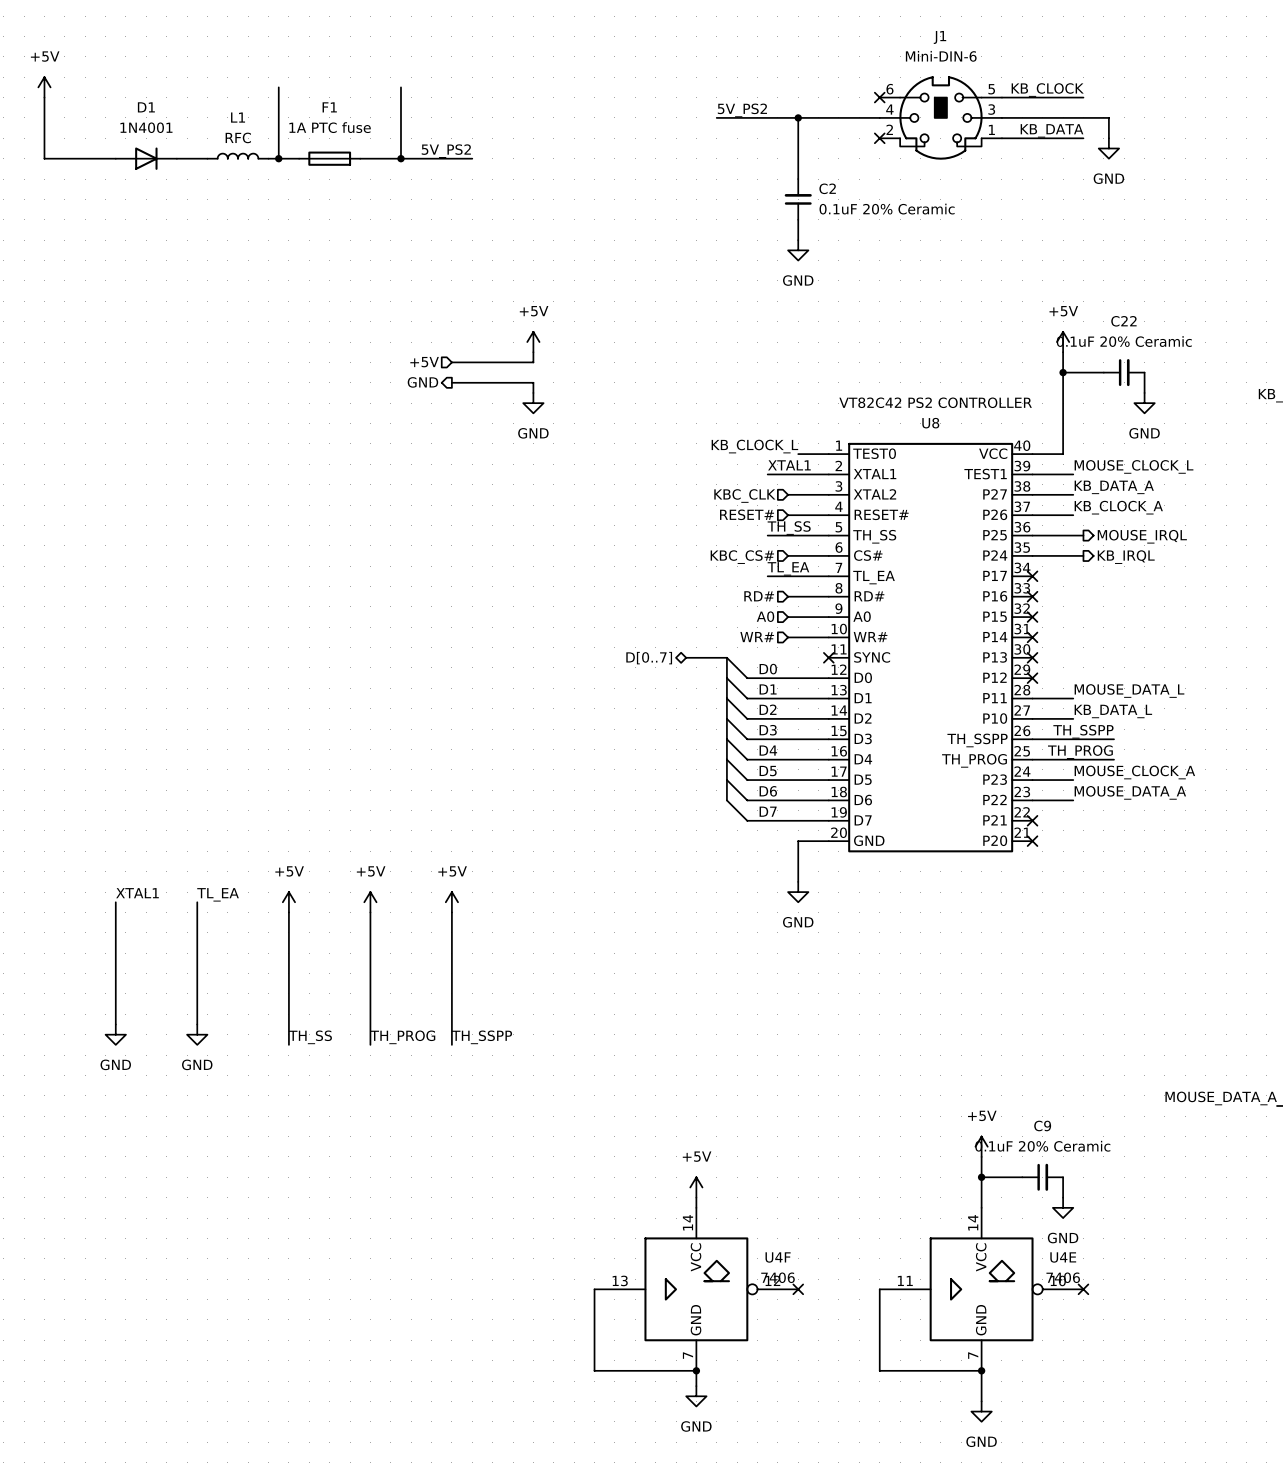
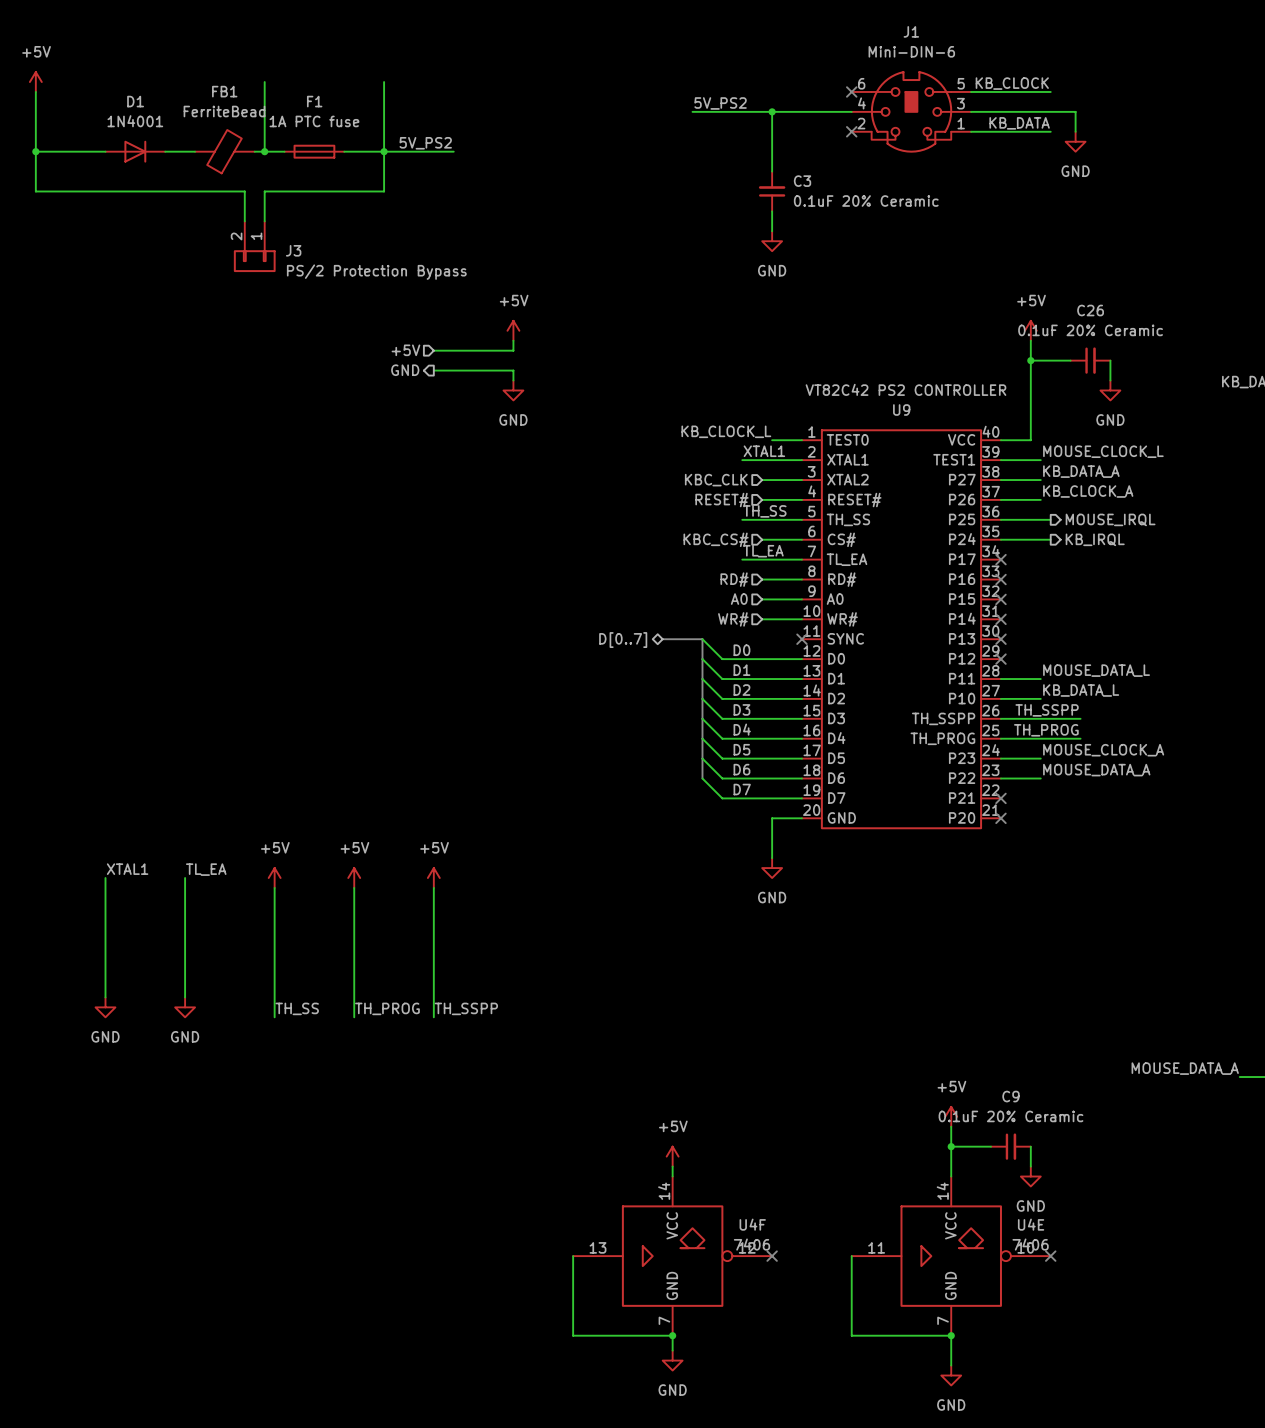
L1: RFC (238, 156) -> none
wire: none -> (35, 151) (35, 191) (244, 191) (244, 221)
junction: none -> (35, 151)
FB1: none -> FerriteBead (224, 151)
wire: none -> (384, 151) (384, 191) (264, 191) (264, 221)
C2 name: C2 (827, 188) -> C3 (802, 181)
J3: none -> PS/2 Protection Bypass (254, 246)
C22 name: C22 (1123, 321) -> C26 (1090, 310)
U8 name: U8 (930, 423) -> U9 (901, 410)

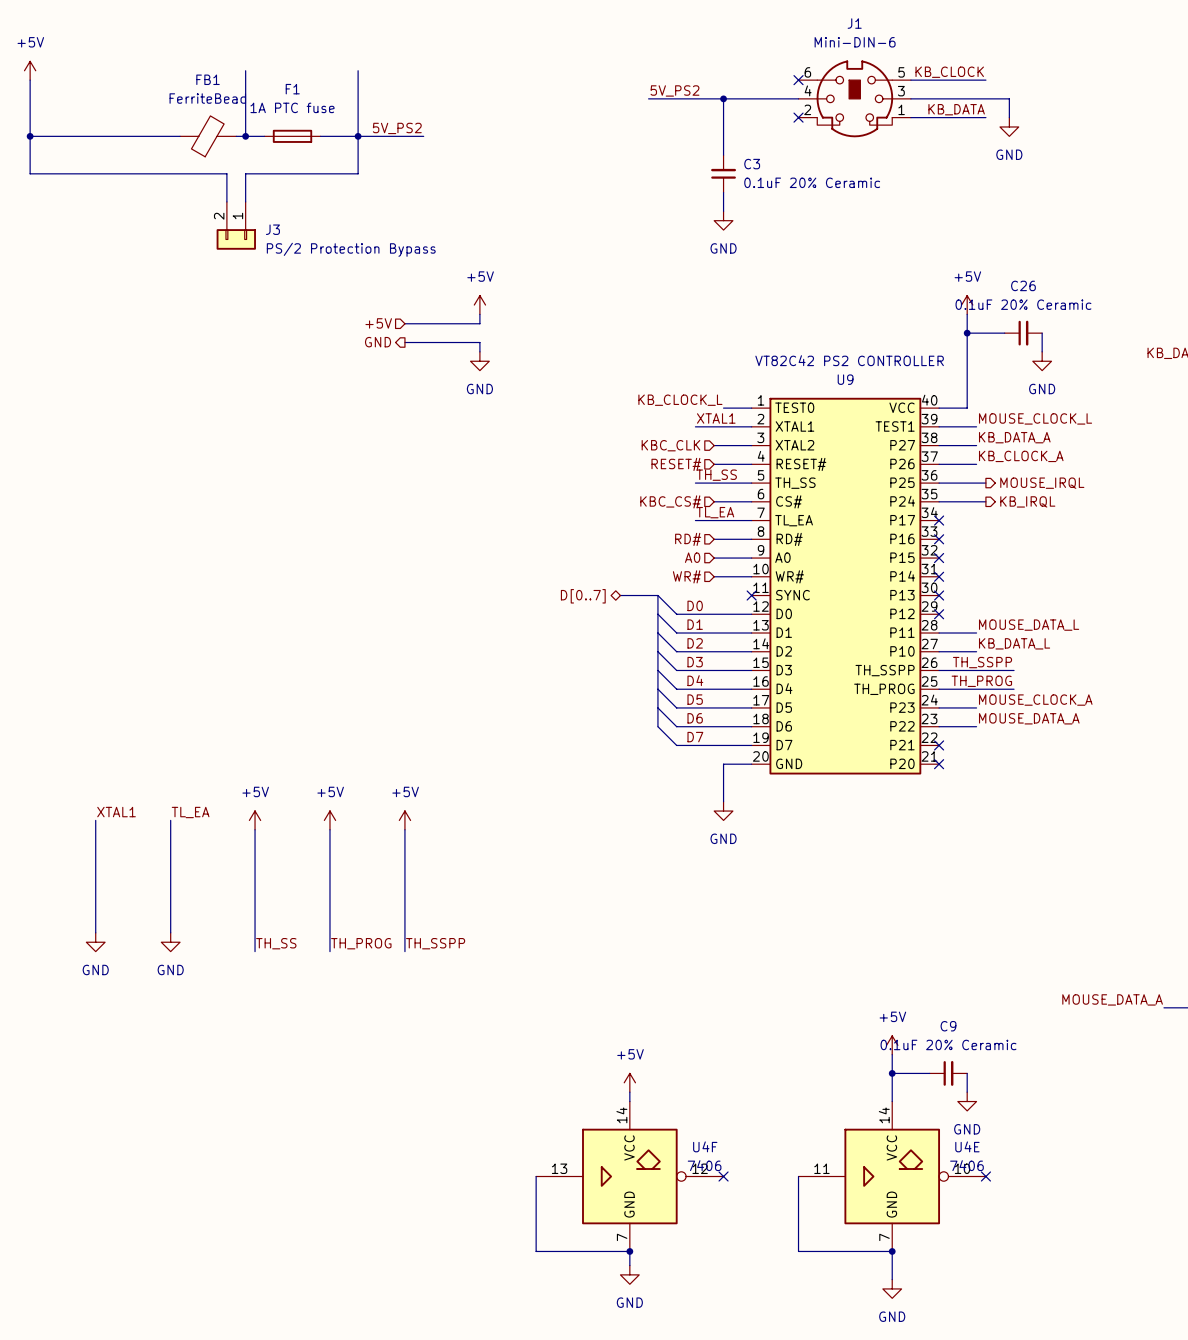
D1: 1N4001 (135, 151) -> none

